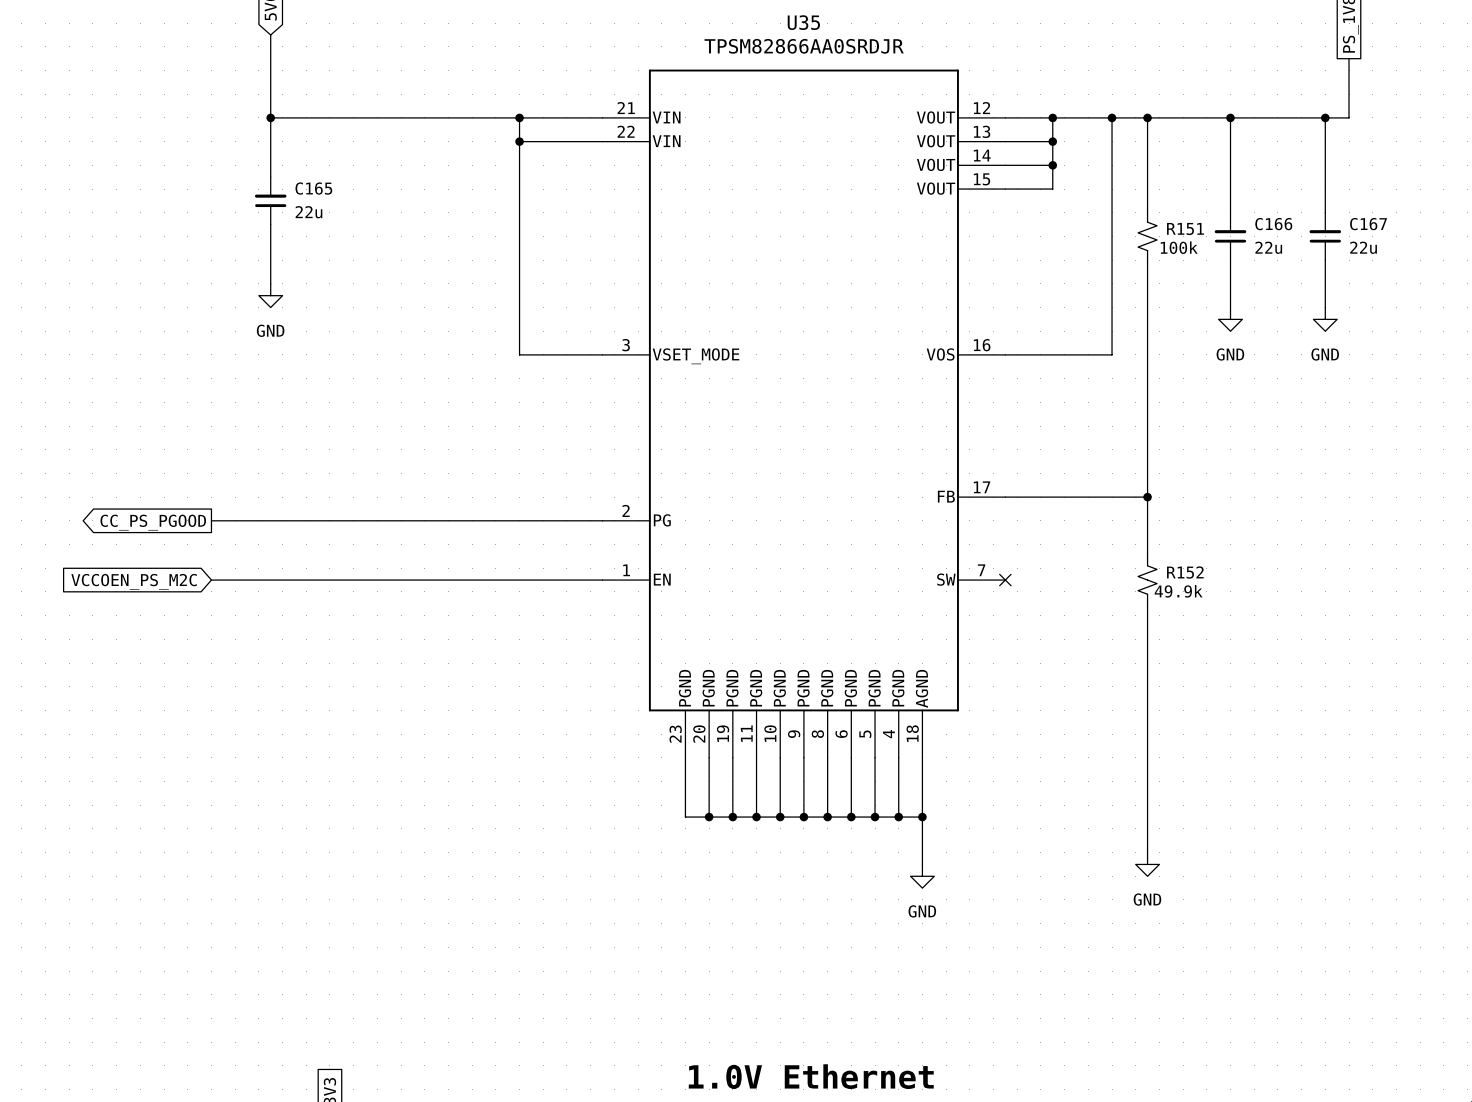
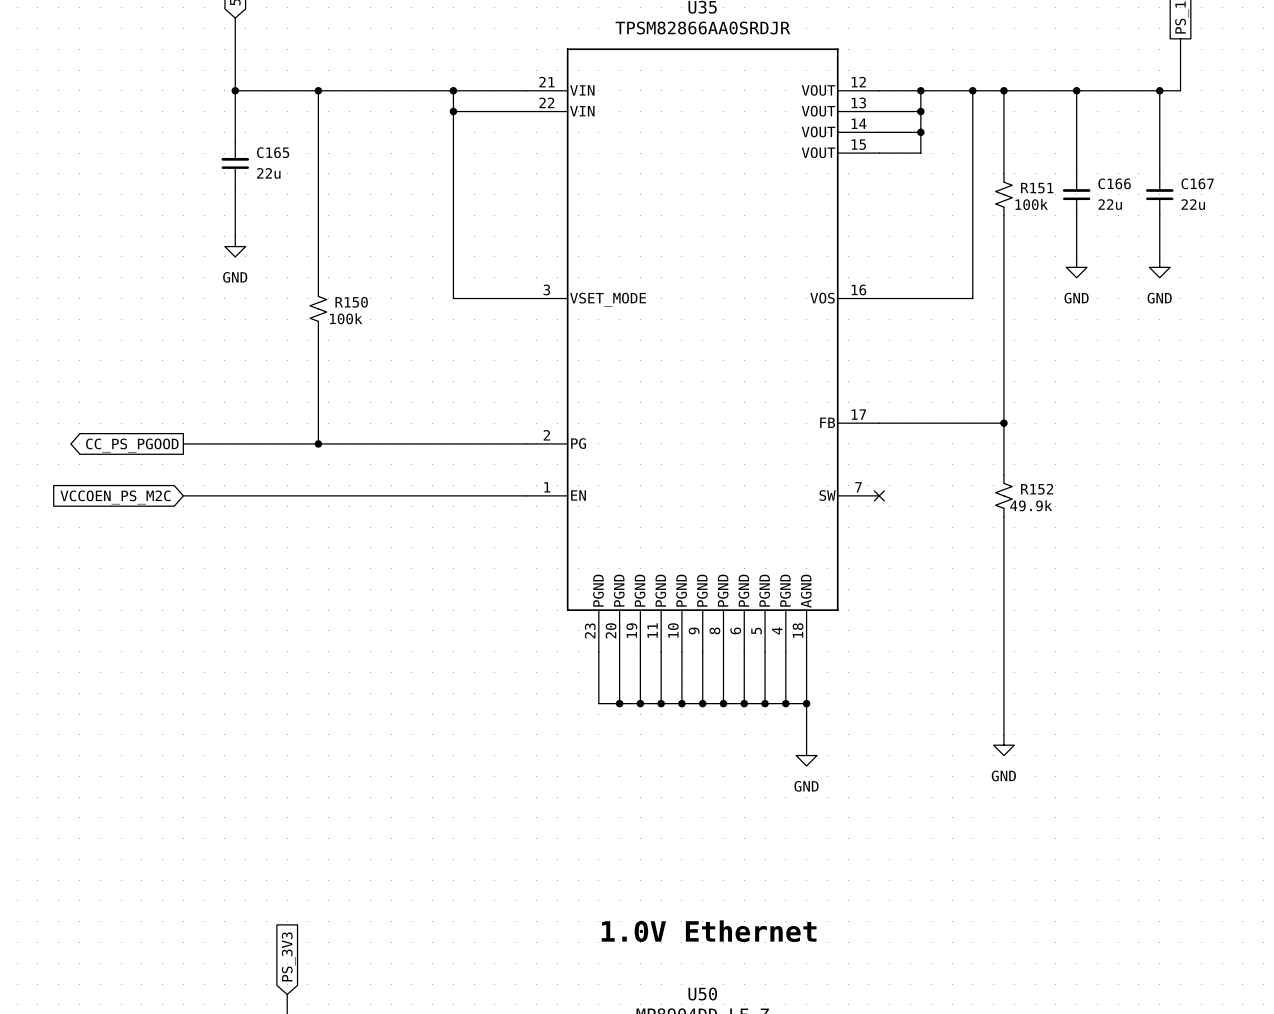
wire: none -> (318, 90) (318, 288)
junction: none -> (318, 90)
R150: none -> 100k (318, 308)
wire: none -> (318, 329) (318, 443)
junction: none -> (318, 443)

